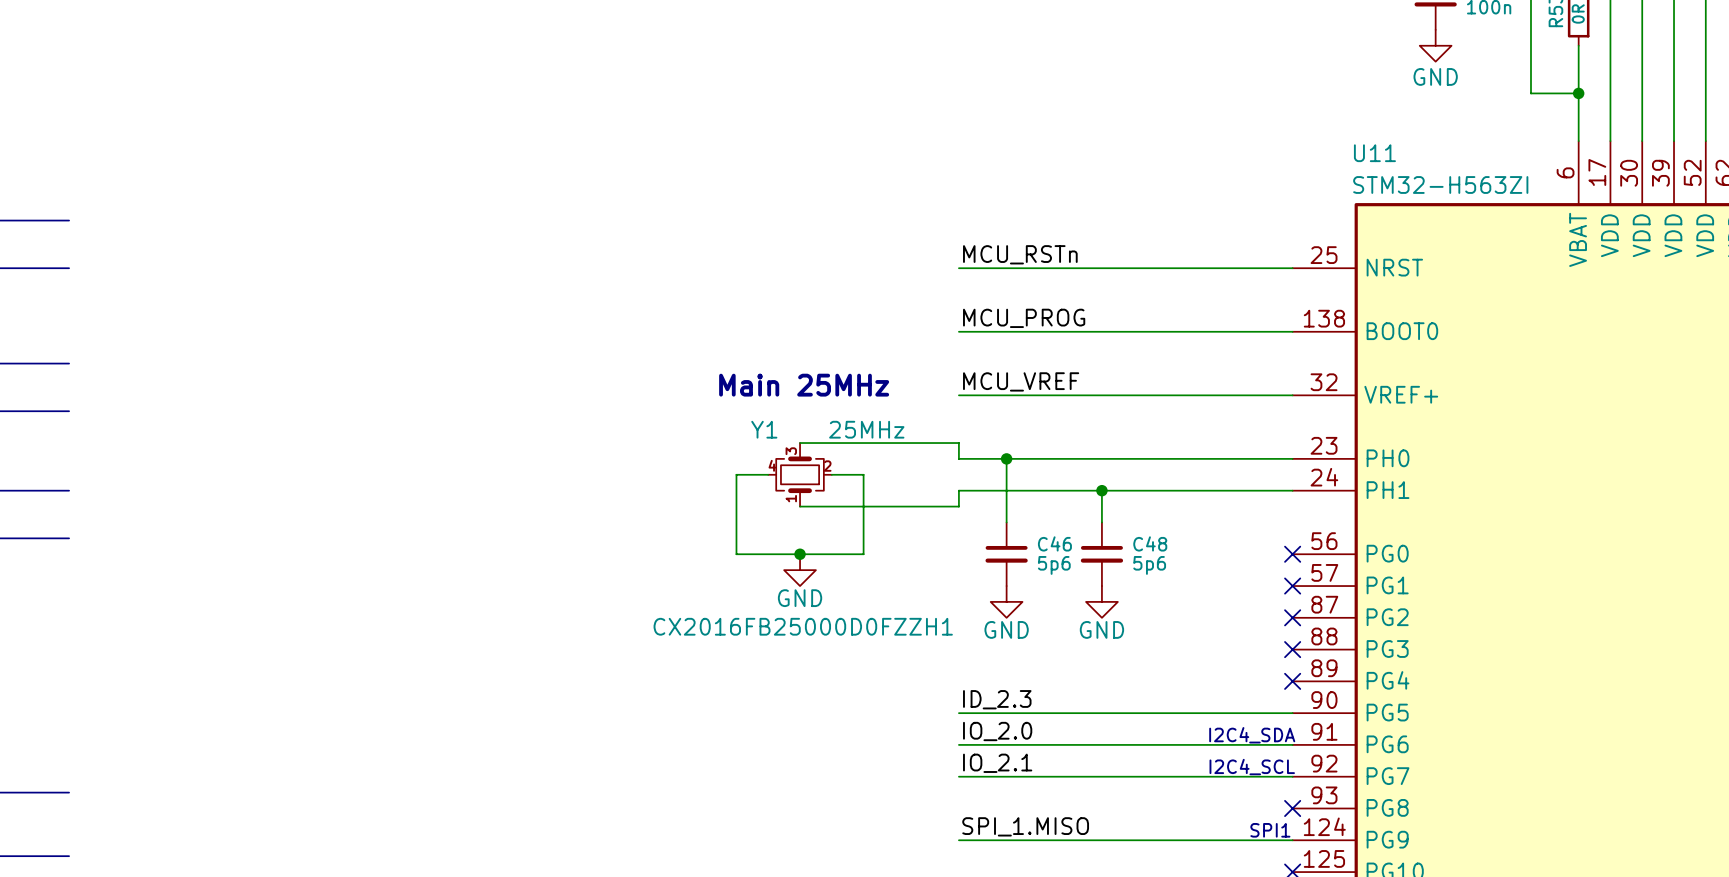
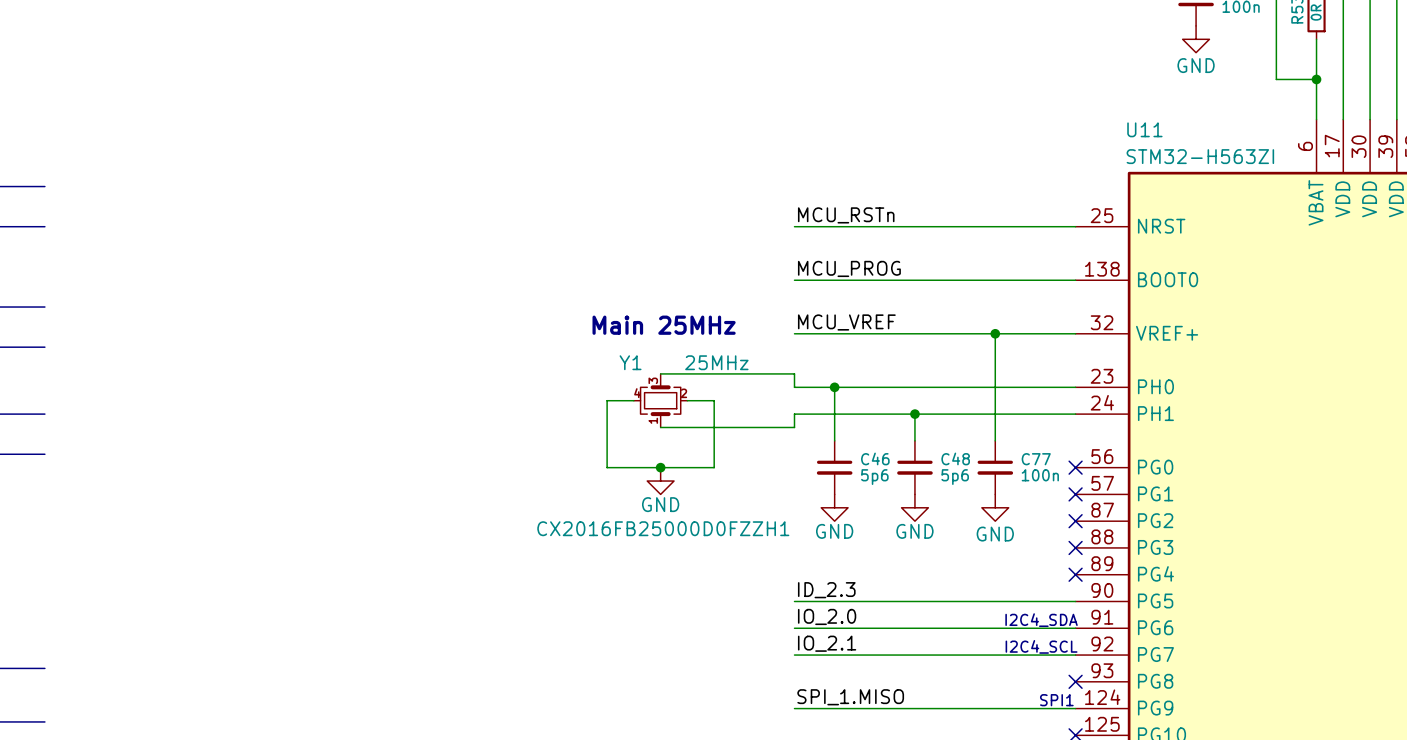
wire: none -> (995, 333) (995, 440)
junction: none -> (995, 333)
C77: none -> 100n (995, 467)
power symbol: none -> GND (995, 507)

